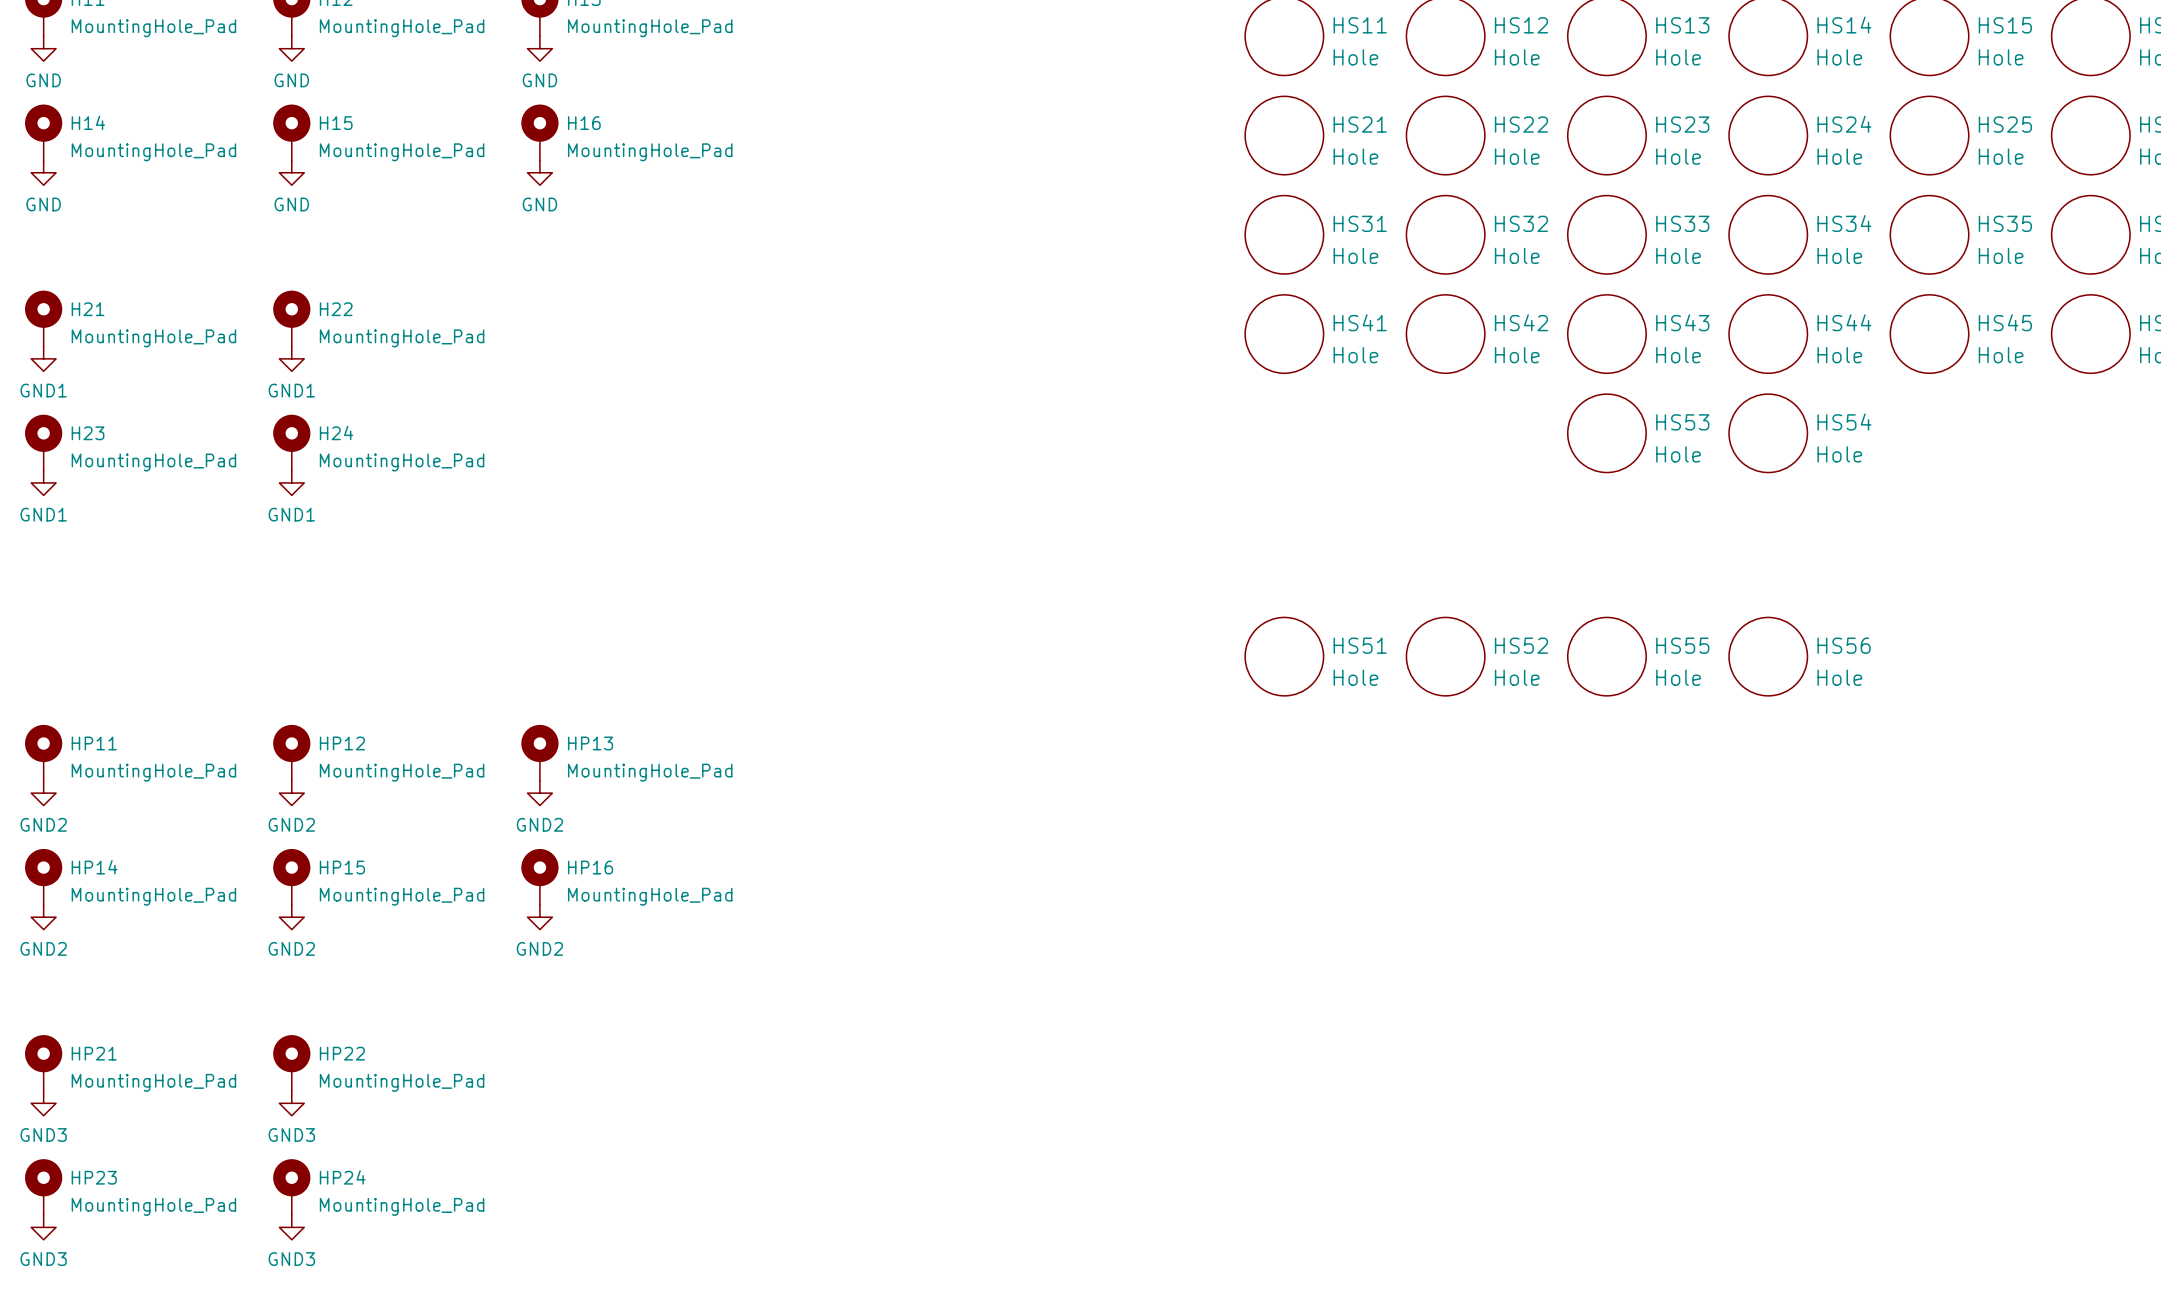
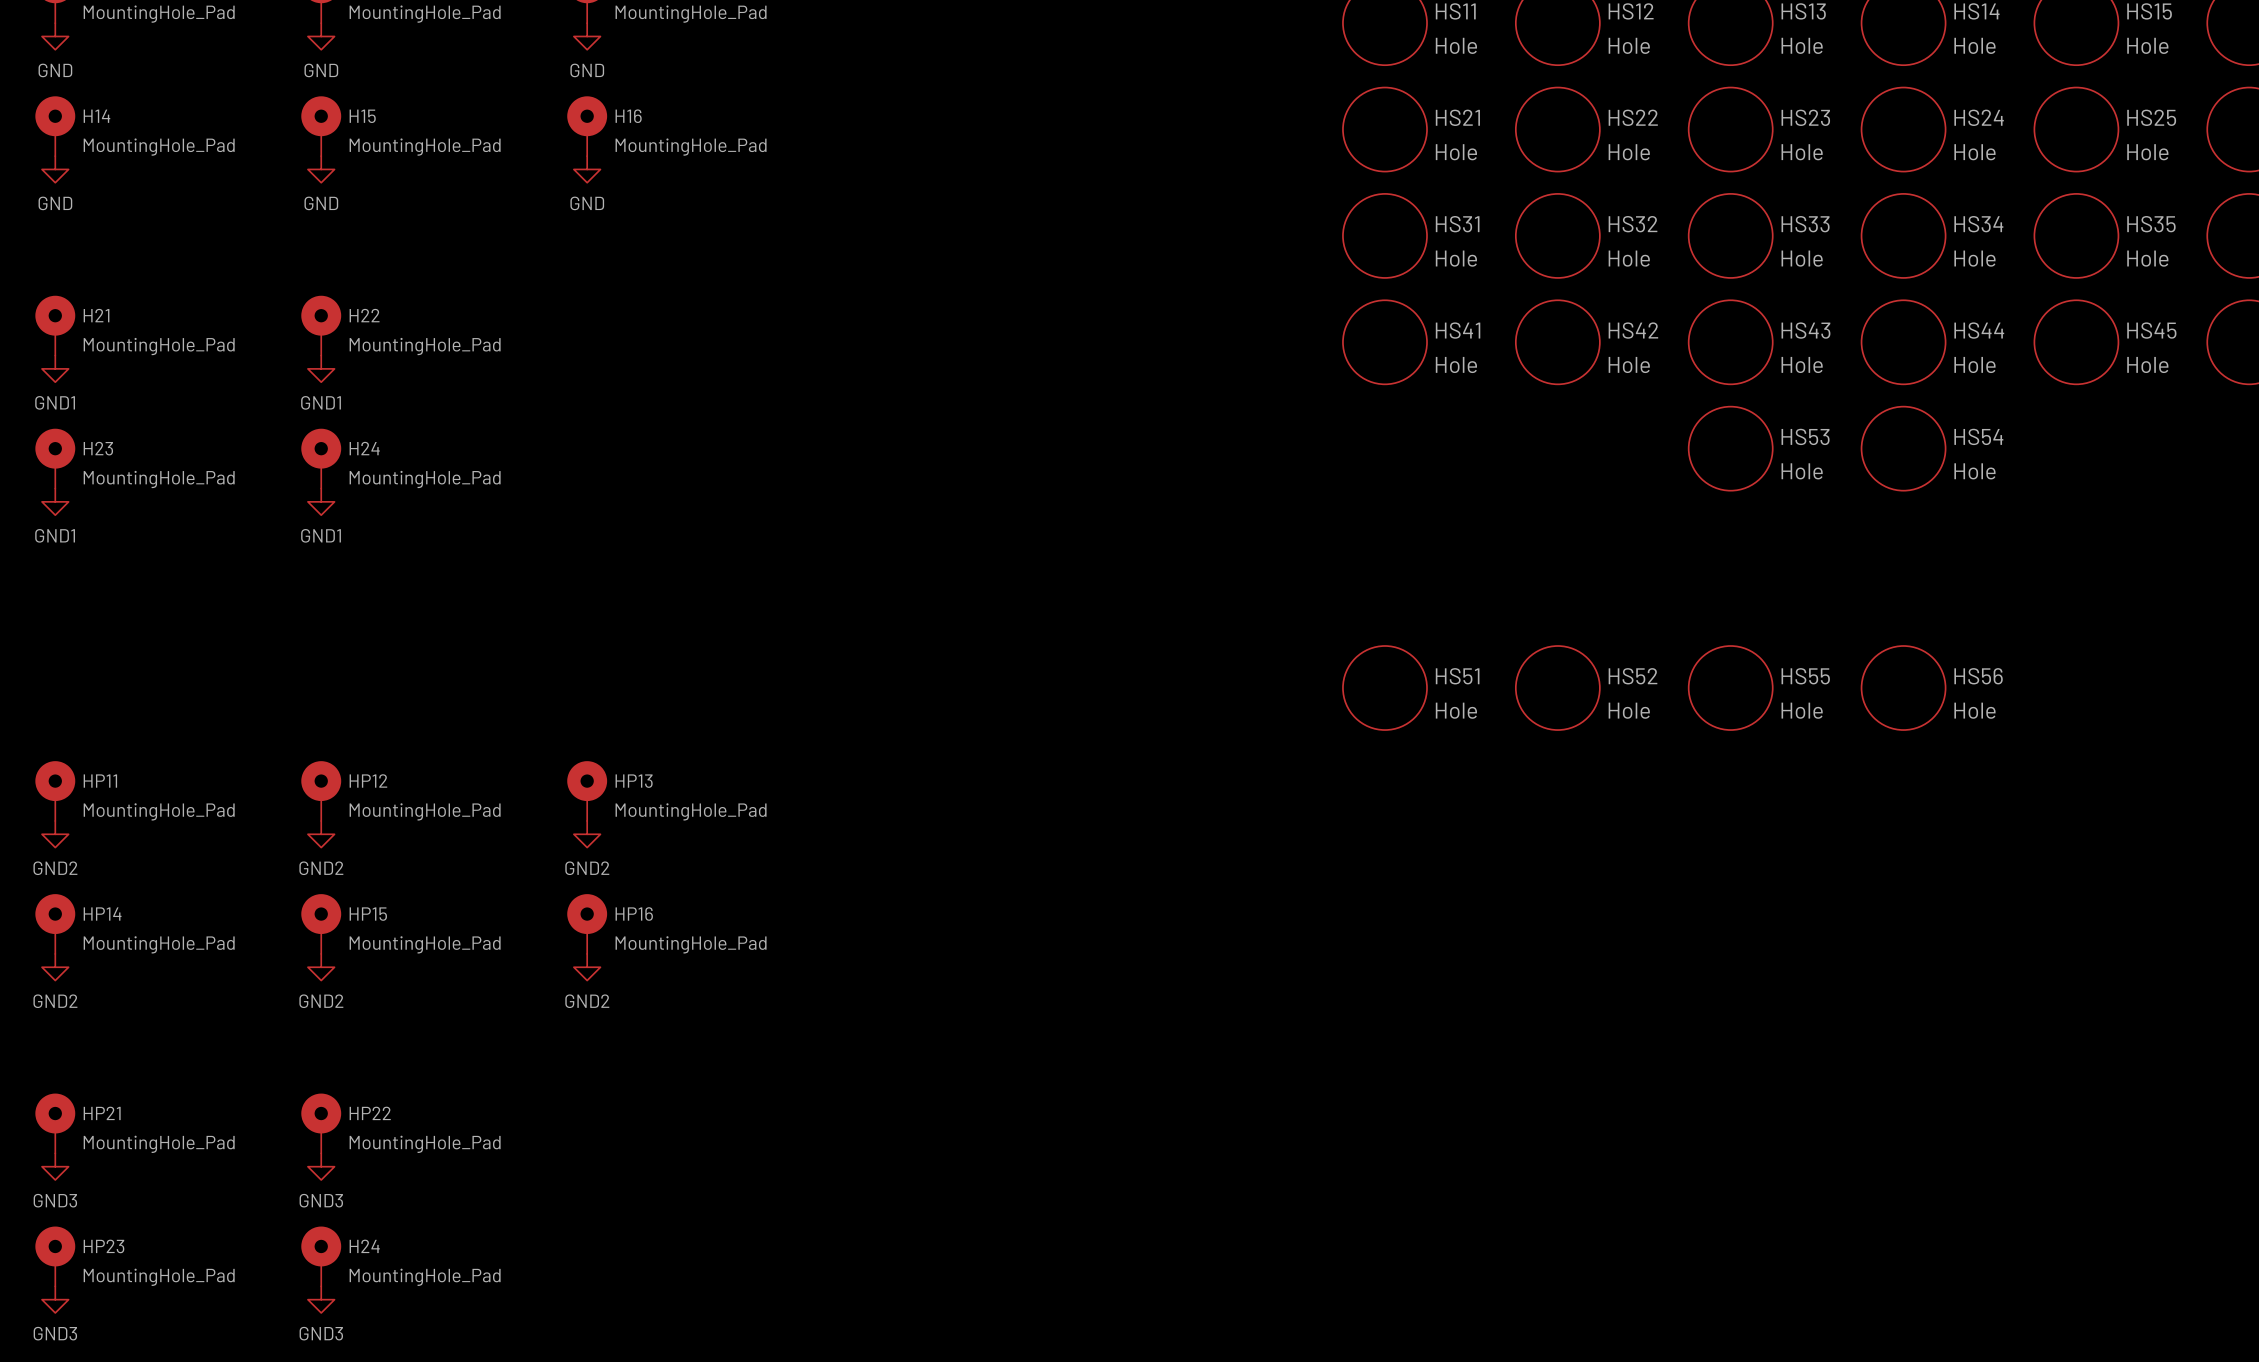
HP24 name: HP24 (342, 1177) -> H24 (364, 1246)

